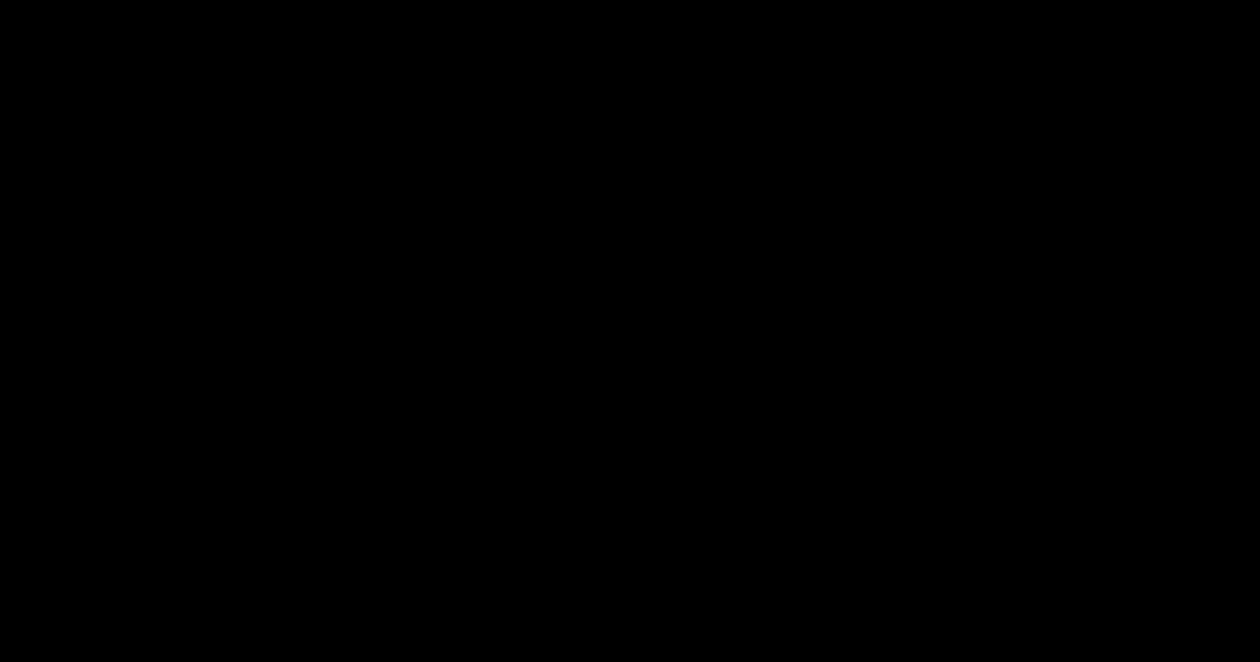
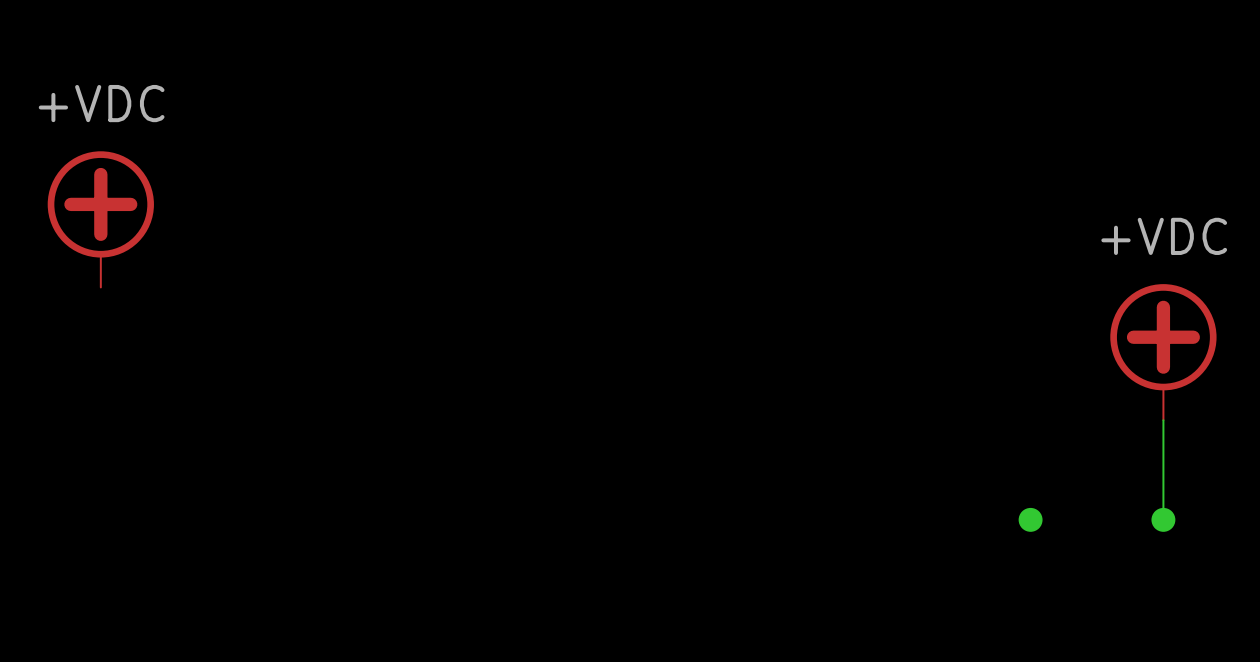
power symbol: none -> +VDC (100, 219)
power symbol: none -> +VDC (1163, 352)
wire: none -> (1163, 420) (1163, 519)
junction: none -> (1030, 519)
junction: none -> (1163, 519)

